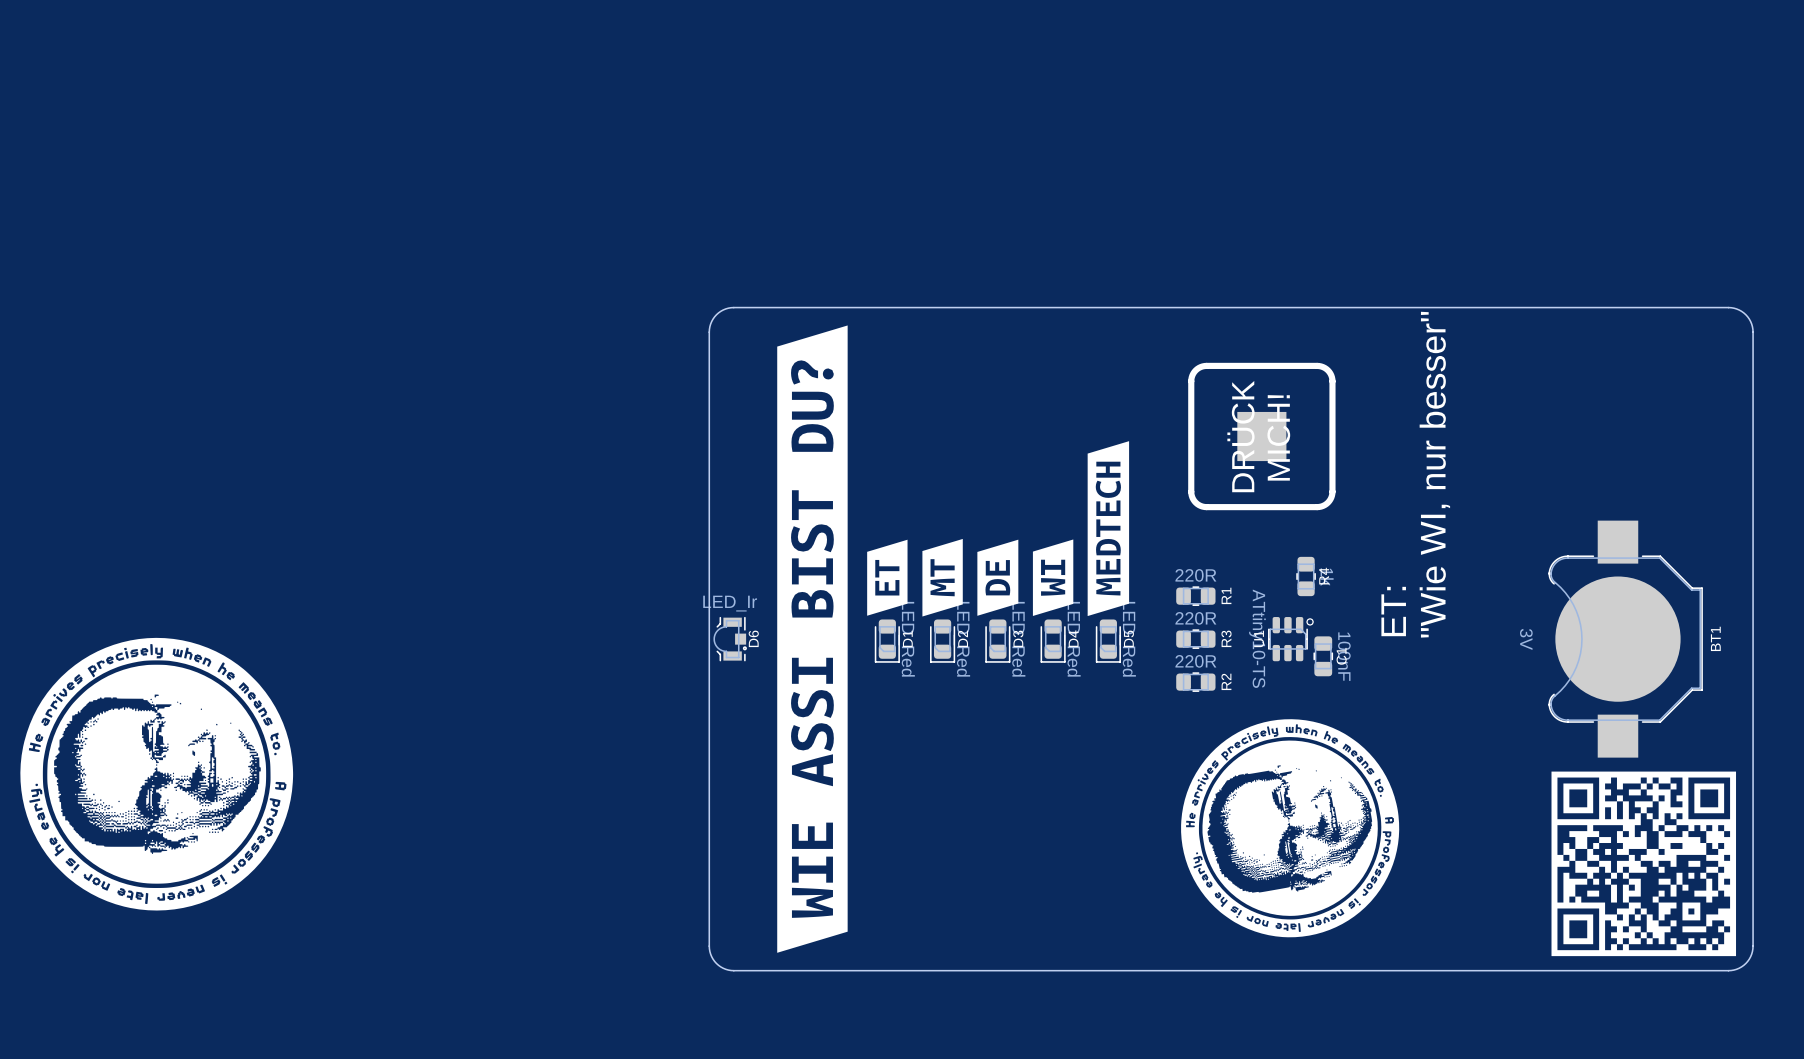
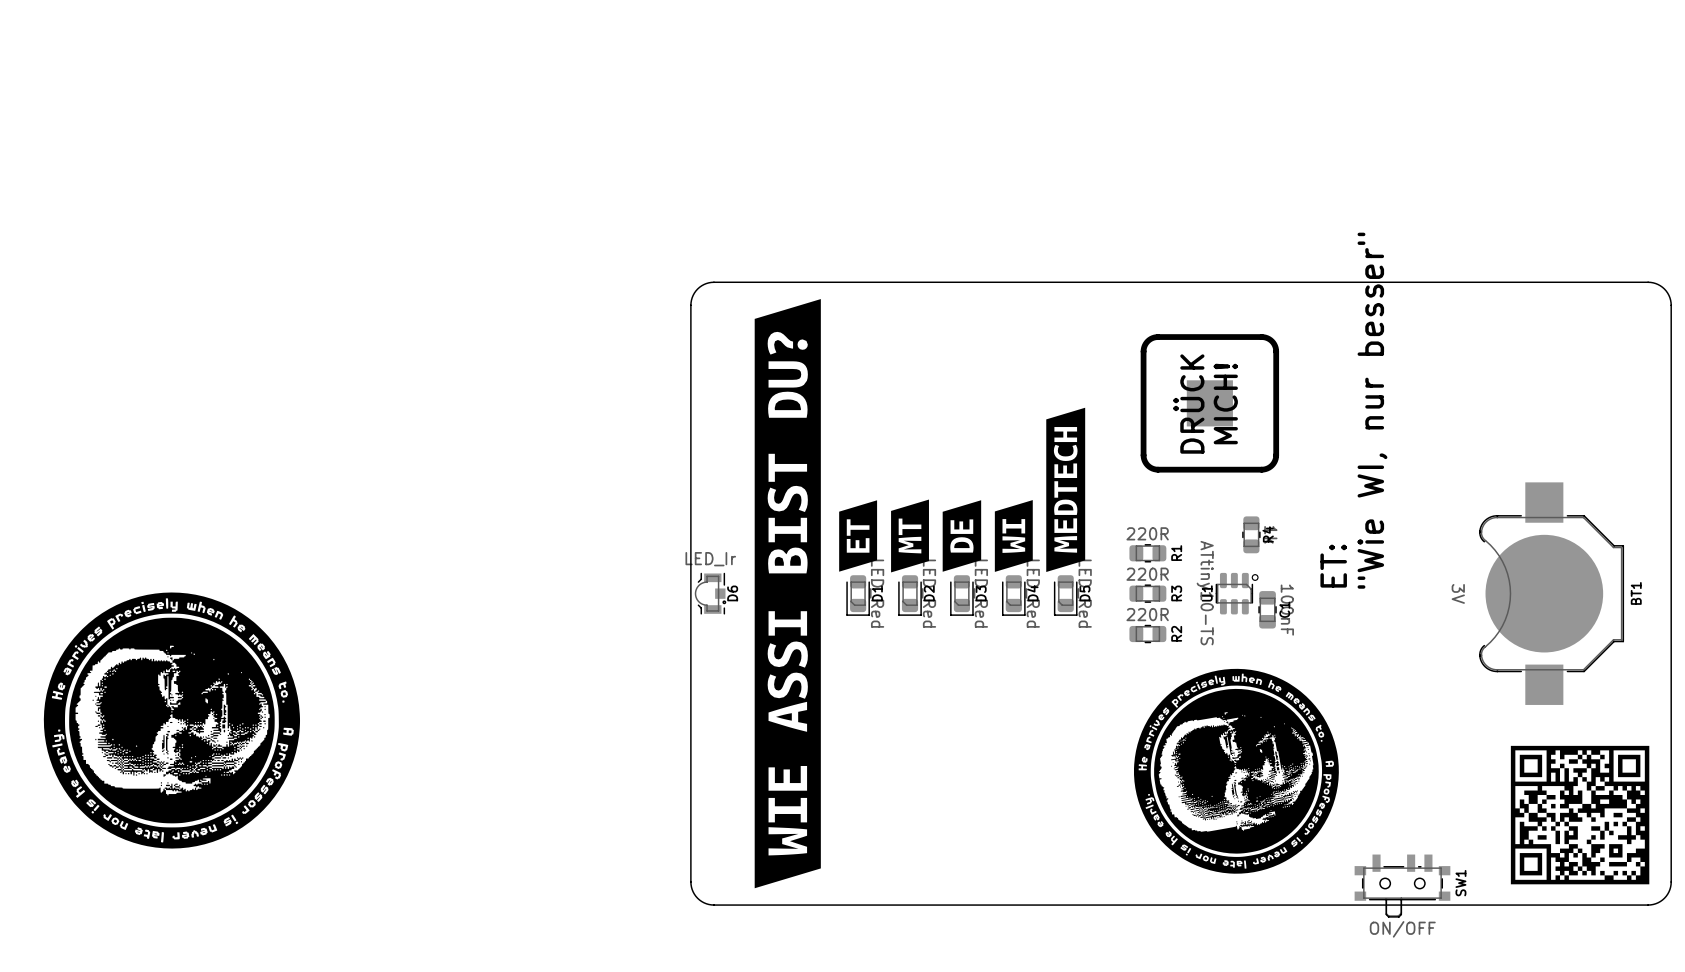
drawing: [1551, 771, 1737, 957] -> none
drawing: none -> [1510, 745, 1650, 885]
SW1: none -> ON/OFF (1402, 886)

